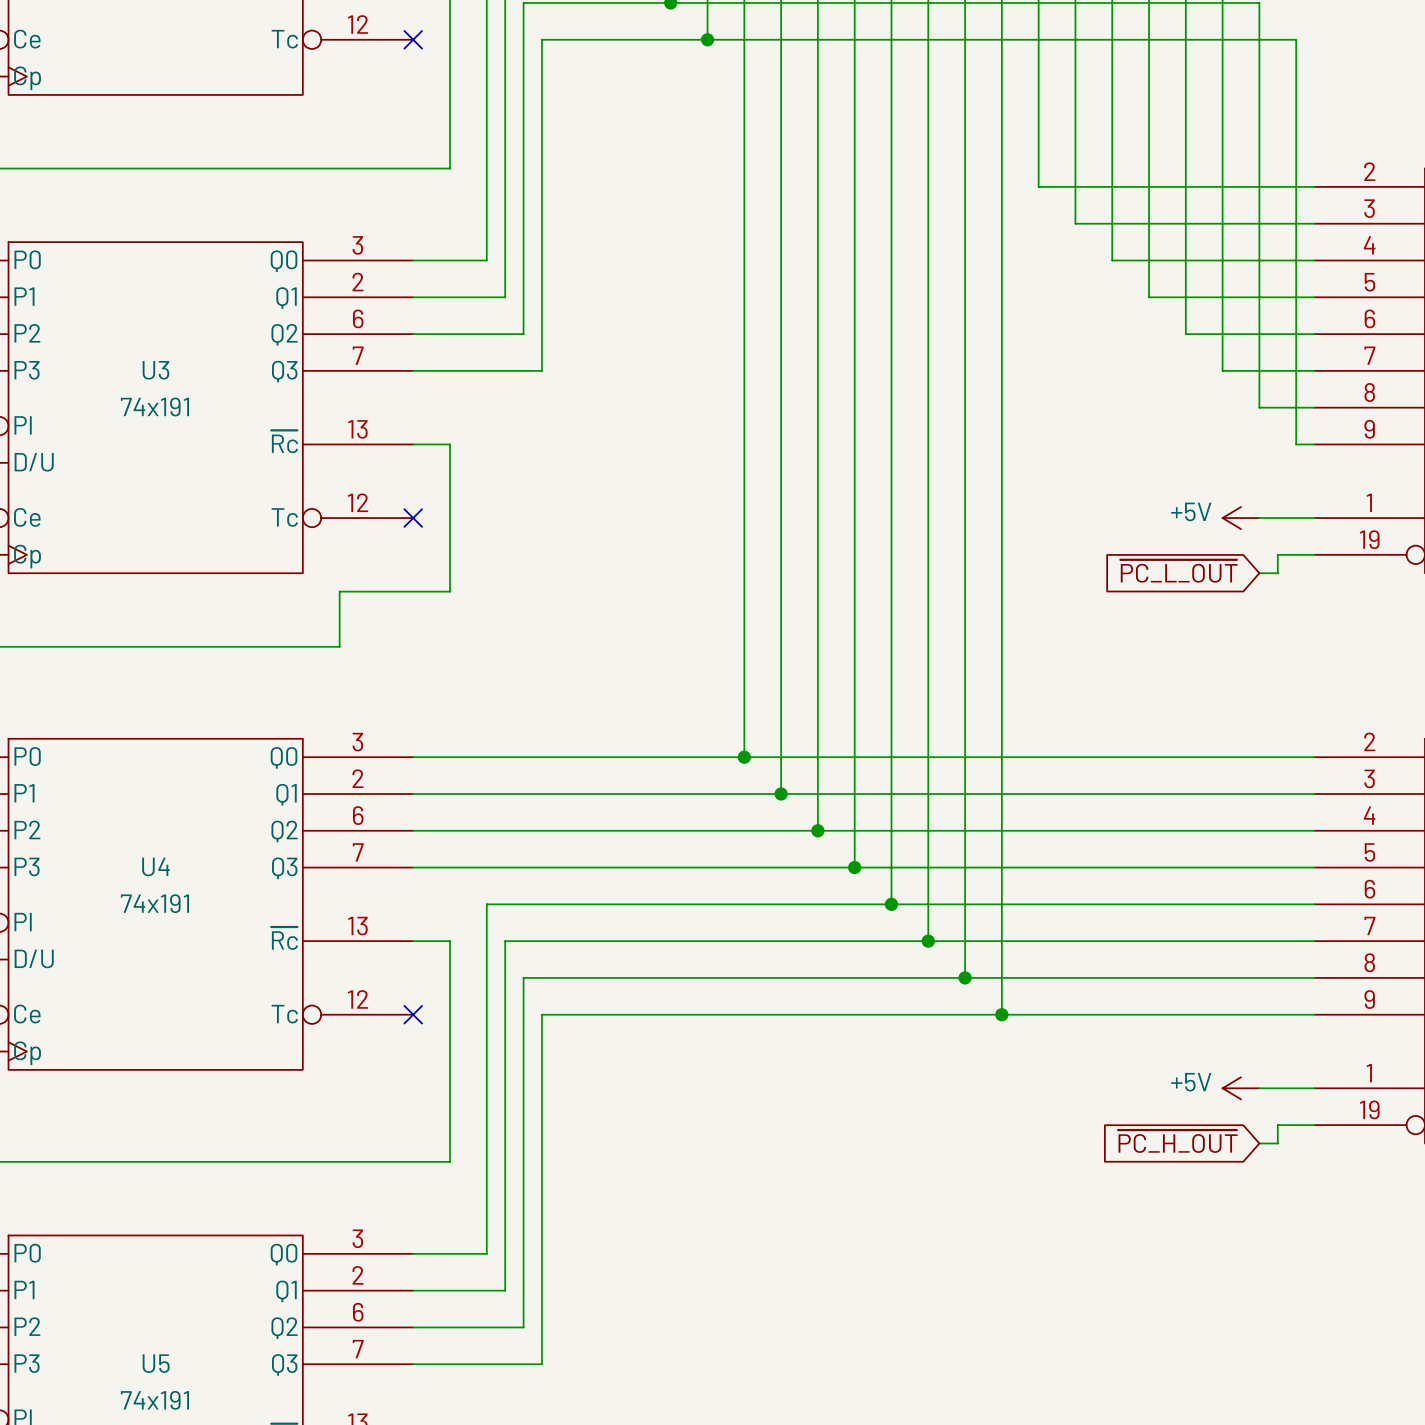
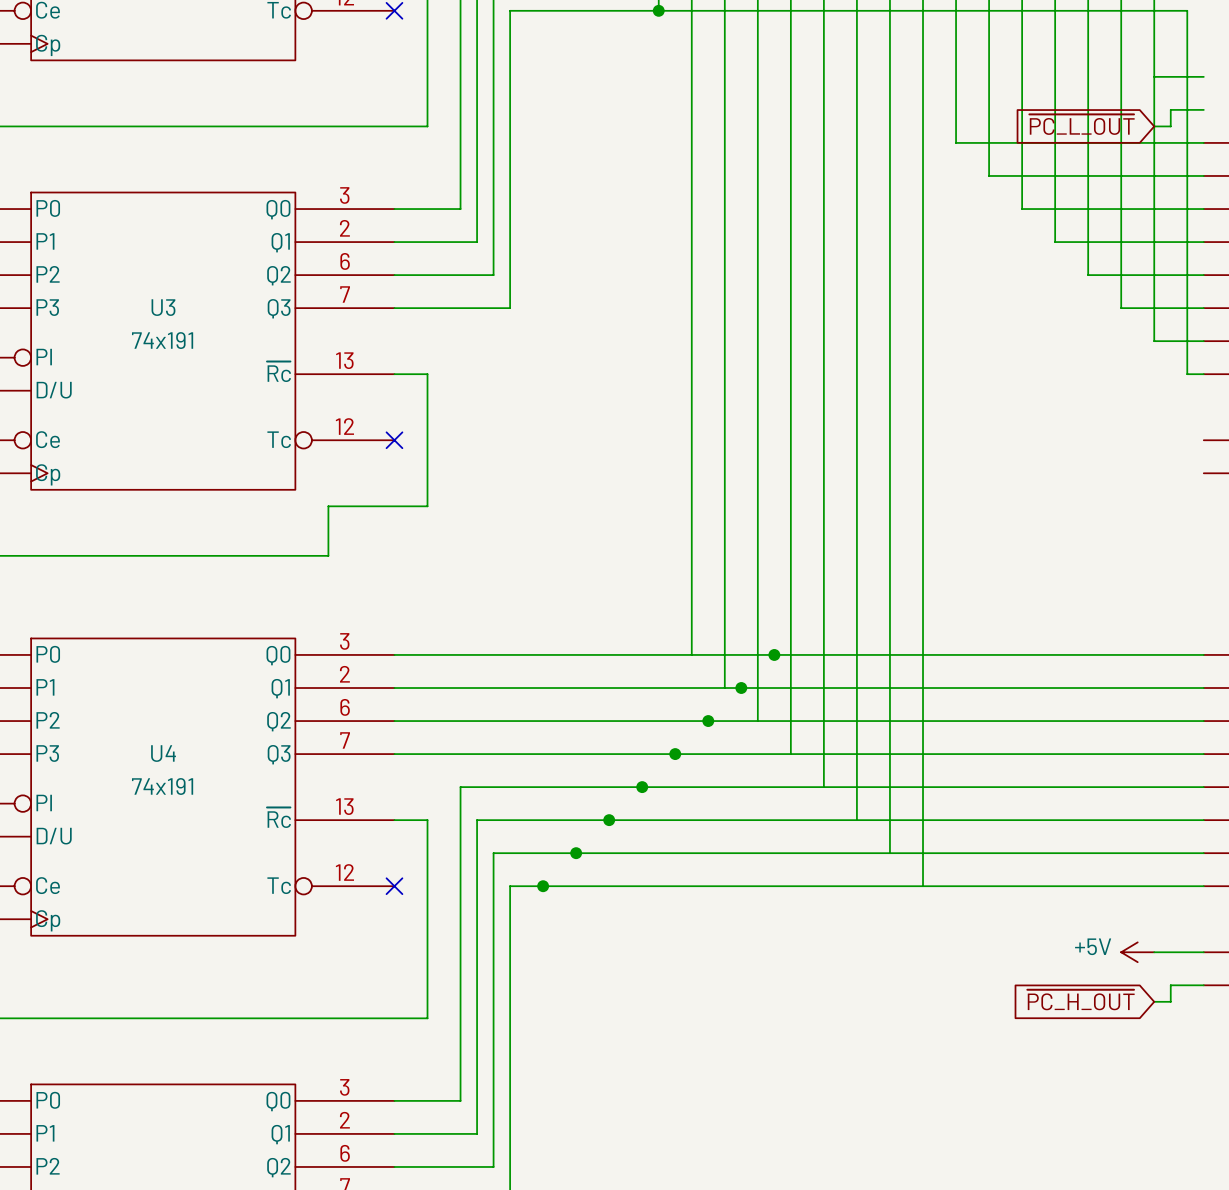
wire: none -> (1154, 76) (1203, 76)
wire: none -> (1203, 109) (1170, 109) (1170, 126) (1154, 126)
global label: none -> ~{PC_L_OUT} (1082, 124)
power symbol: +5V (1241, 518) -> none
wire: (1259, 518) (1314, 518) -> none
wire: (1314, 554) (1277, 554) (1277, 573) (1259, 573) -> none
global label: ~{PC_L_OUT} (1178, 571) -> none
junction: (744, 757) -> none
junction: none -> (774, 654)
junction position: (781, 793) -> (741, 688)
junction: none -> (708, 721)
junction: (817, 830) -> none
junction: none -> (675, 754)
junction: (854, 867) -> none
junction: none -> (642, 787)
junction: (891, 904) -> none
junction: none -> (609, 820)
junction: (928, 941) -> none
junction: none -> (576, 853)
junction: (965, 977) -> none
junction: none -> (543, 886)
junction: (1001, 1014) -> none

